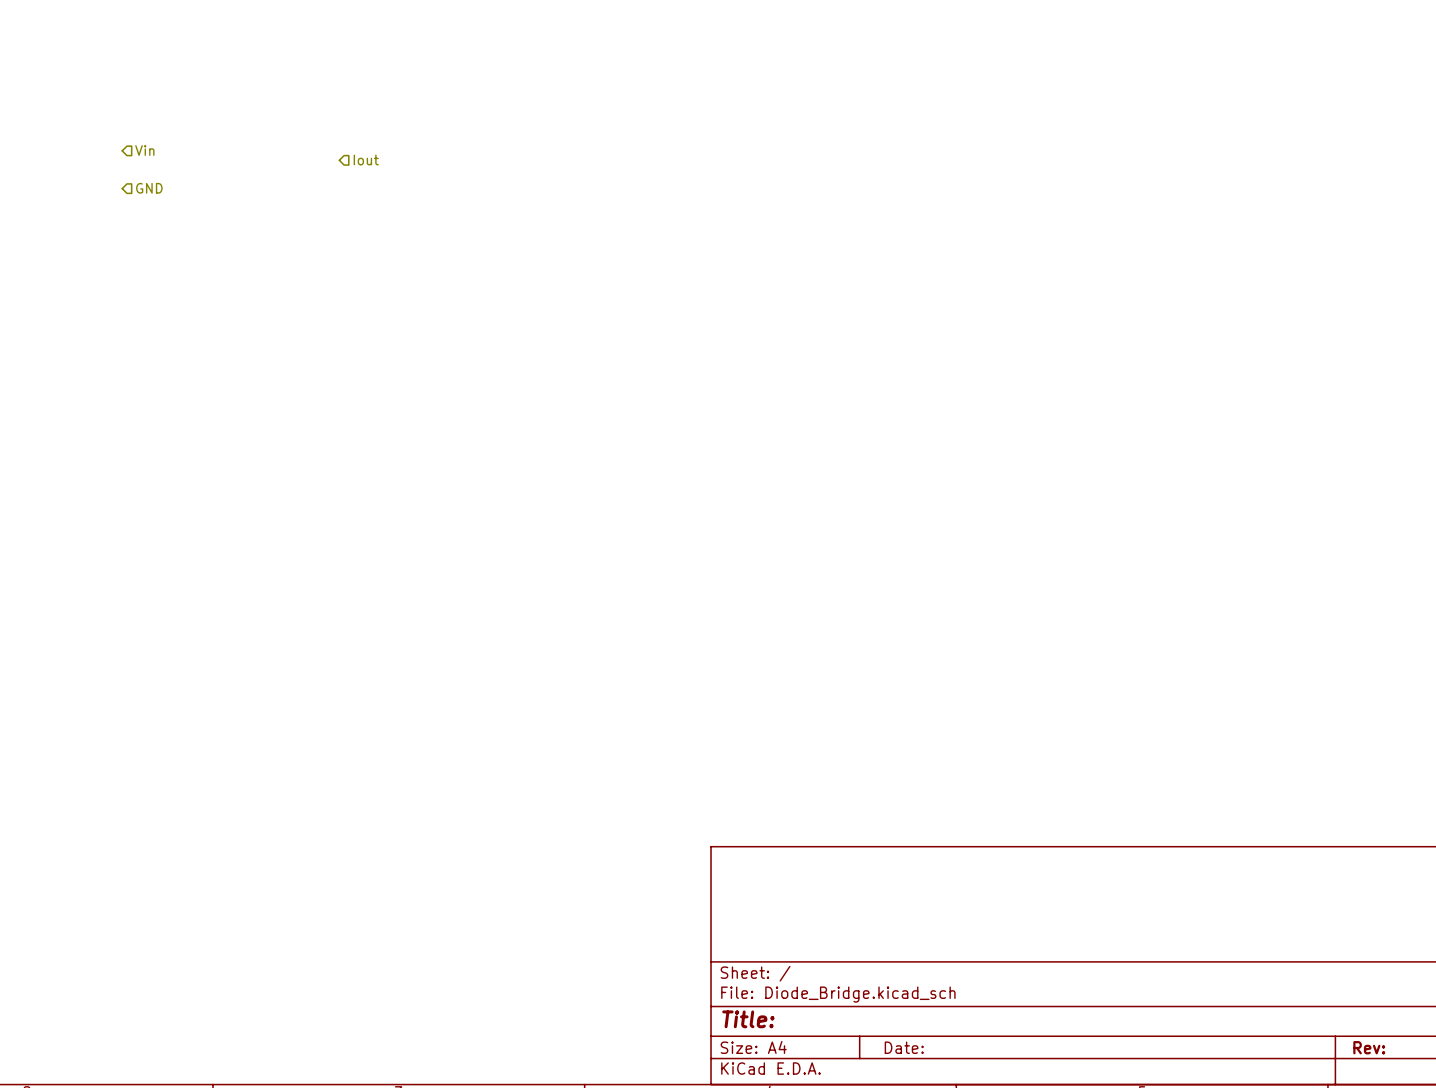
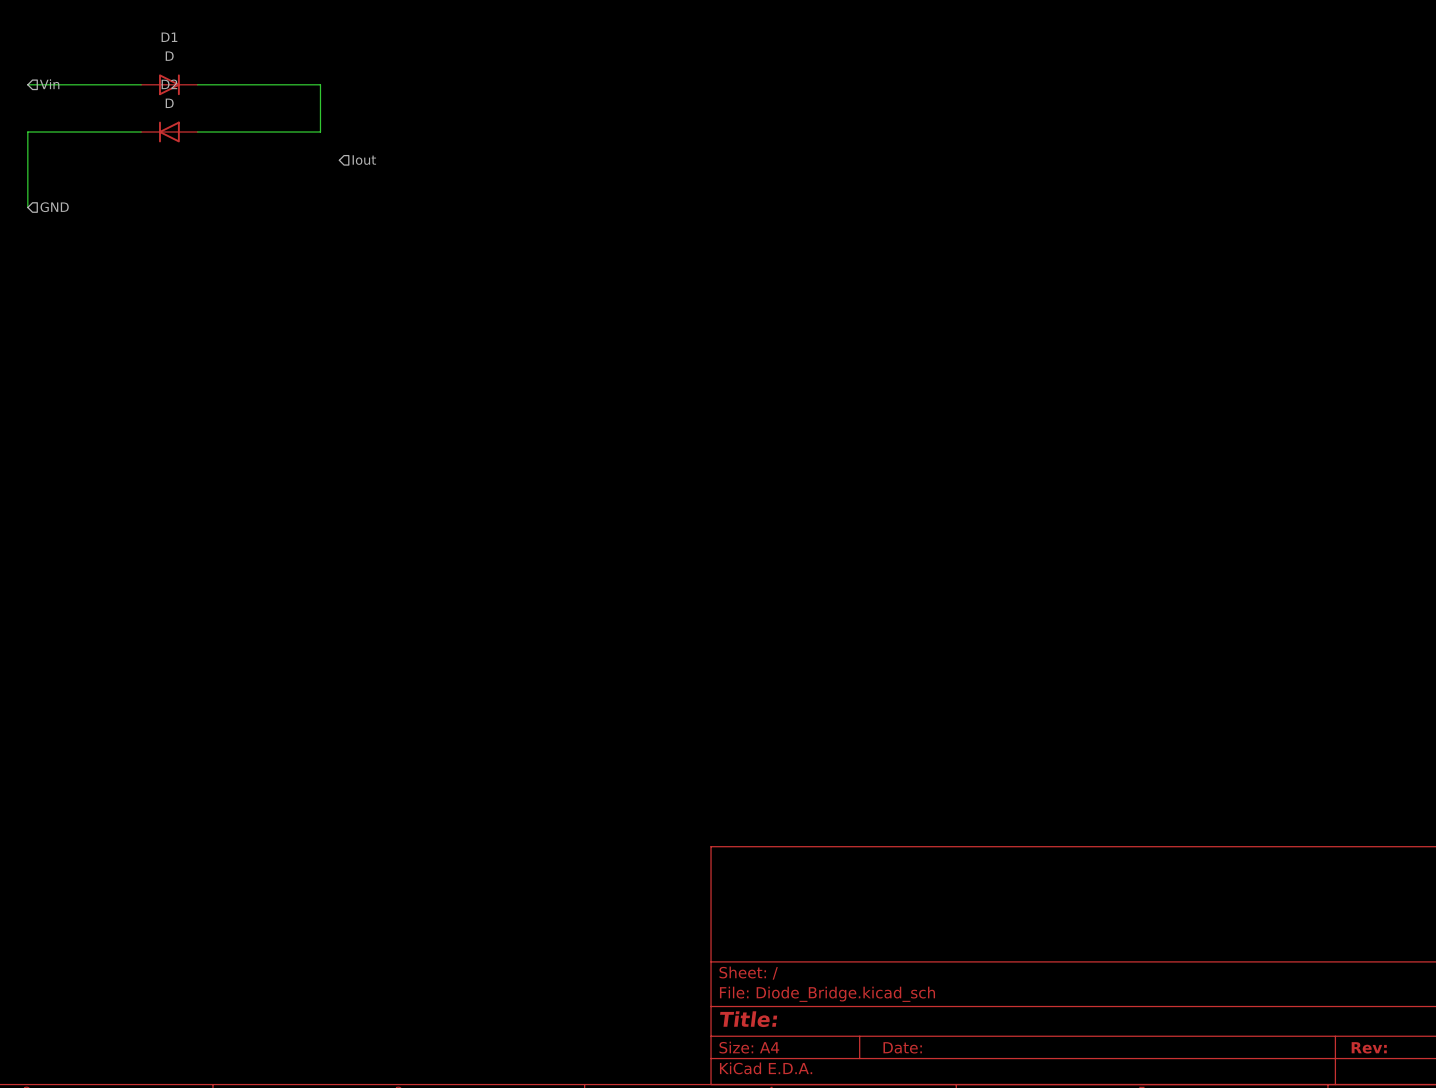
wire: none -> (27, 84) (141, 84)
D1: none -> D (169, 84)
wire: none -> (197, 84) (320, 84) (320, 132) (197, 132)
wire: none -> (141, 132) (27, 132) (27, 207)
D2: none -> D (169, 132)
hierarchical label position: Vin (144, 150) -> Vin (49, 84)
hierarchical label position: GND (149, 188) -> GND (54, 207)

